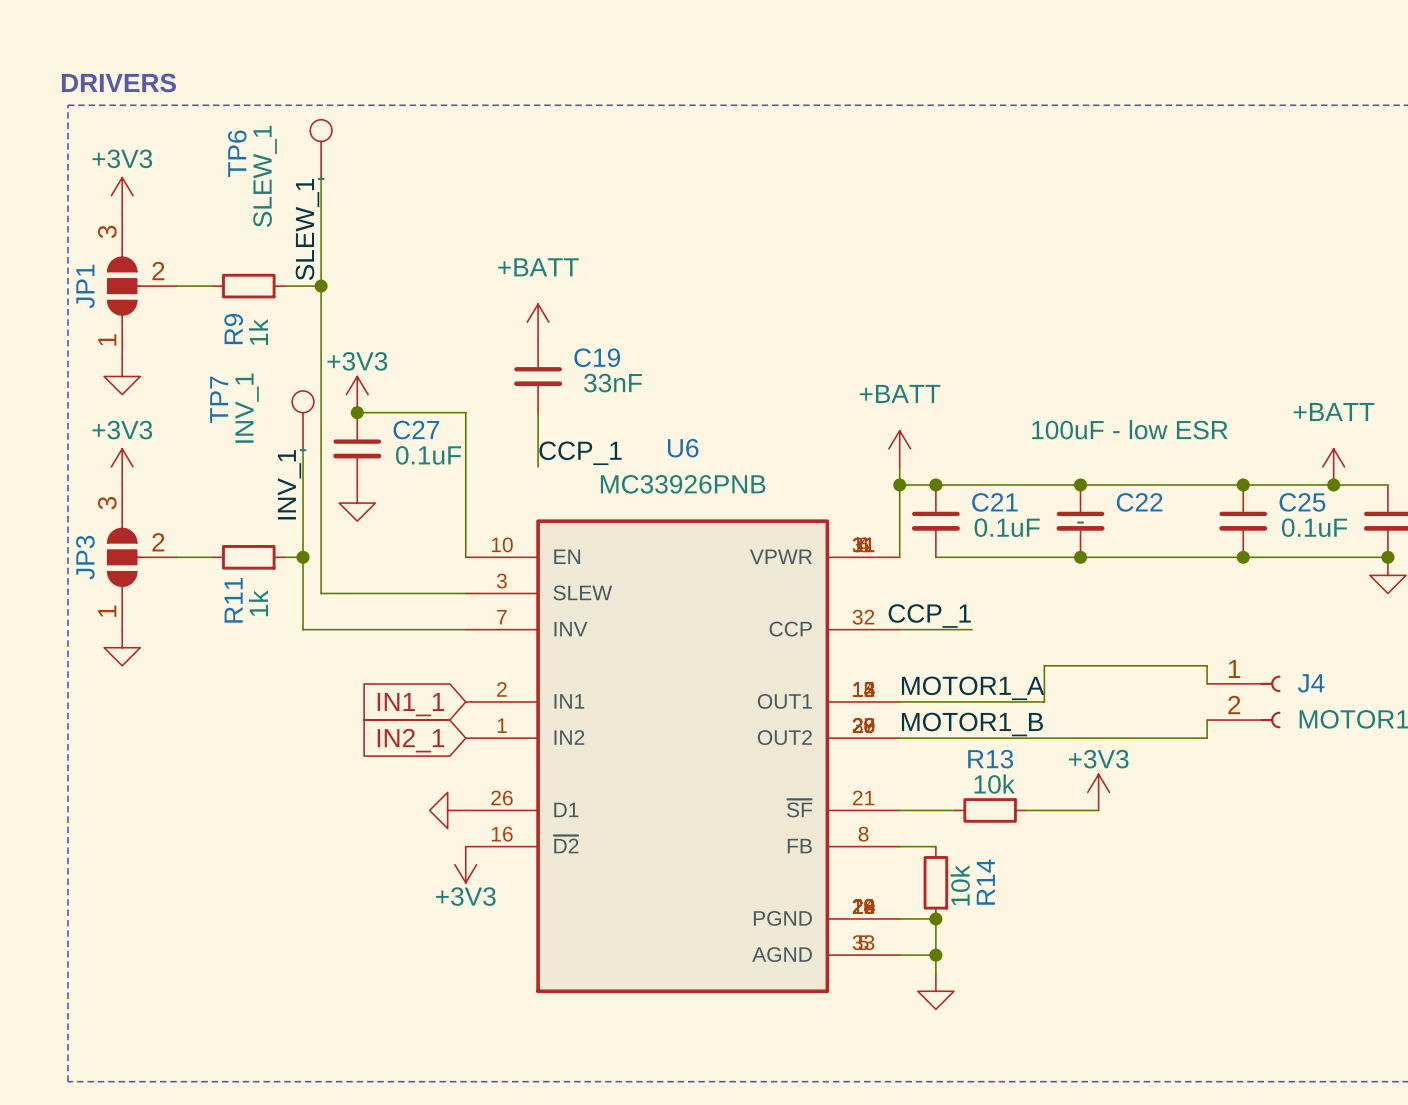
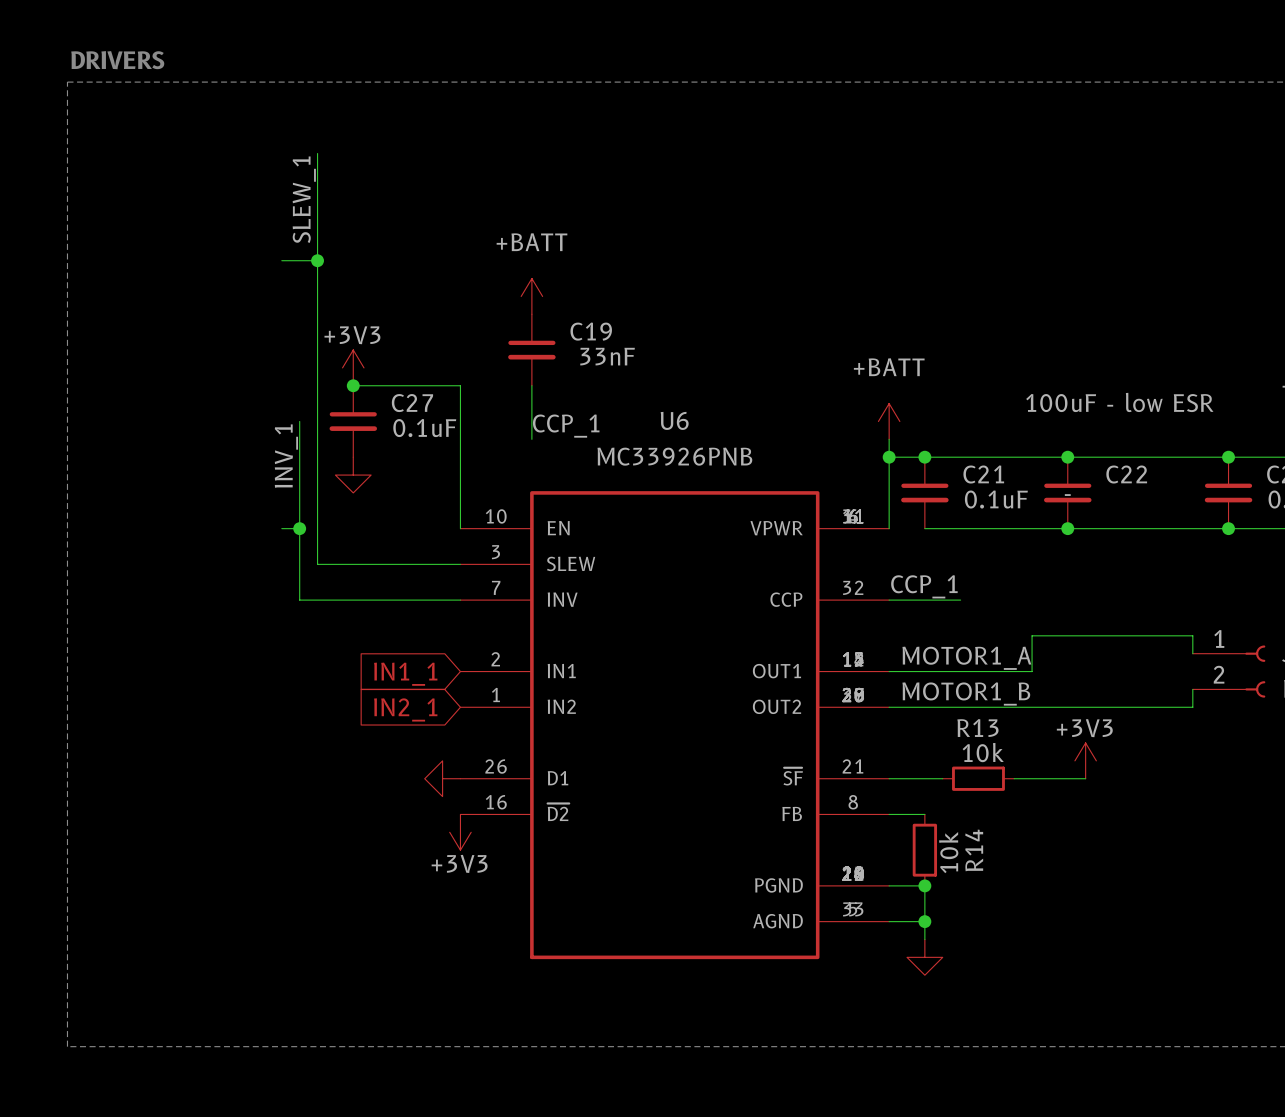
TP6: SLEW_1 (321, 148) -> none
power symbol: +3V3 (122, 195) -> none
JP1: (142, 286) -> none
wire: (176, 286) (212, 286) -> none
R9: 1k (248, 286) -> none
power symbol: (122, 376) -> none
TP7: INV_1 (303, 419) -> none
power symbol: +3V3 (122, 466) -> none
JP3: (142, 557) -> none
wire: (176, 557) (212, 557) -> none
R11: 1k (248, 557) -> none
power symbol: (122, 647) -> none

